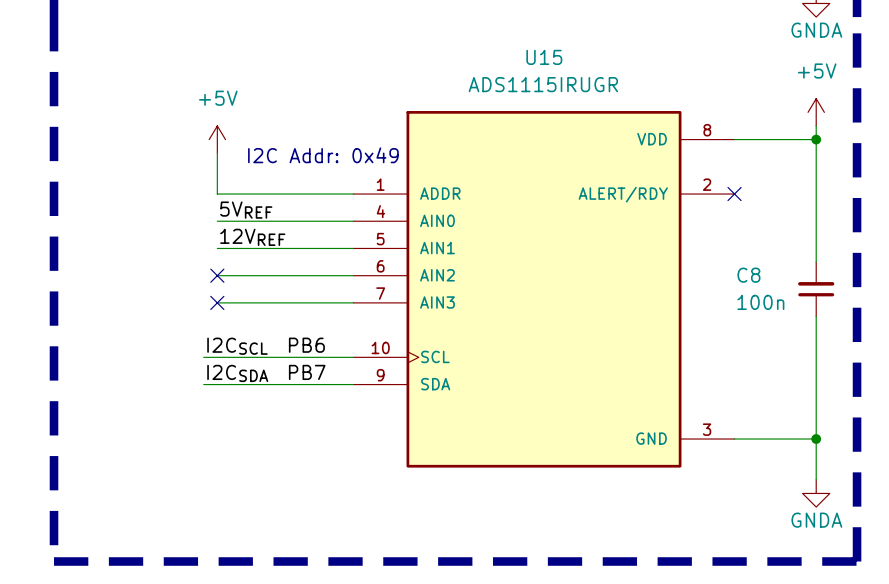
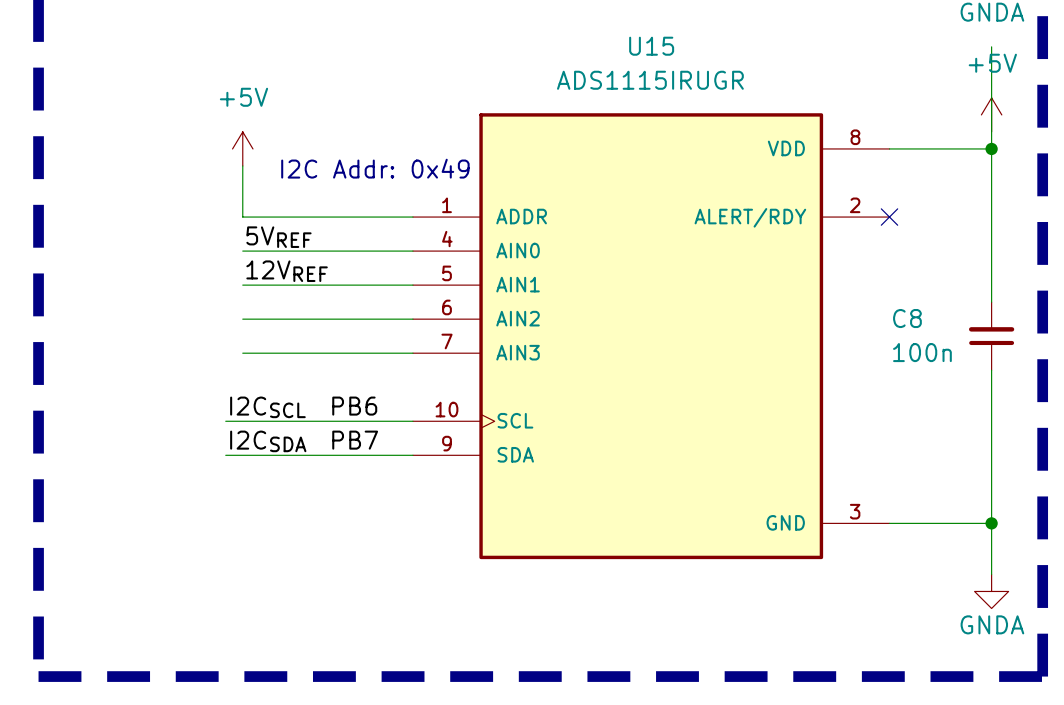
wire: none -> (991, 46) (991, 131)
no-connect mark: (217, 275) -> none
no-connect mark: (217, 302) -> none

